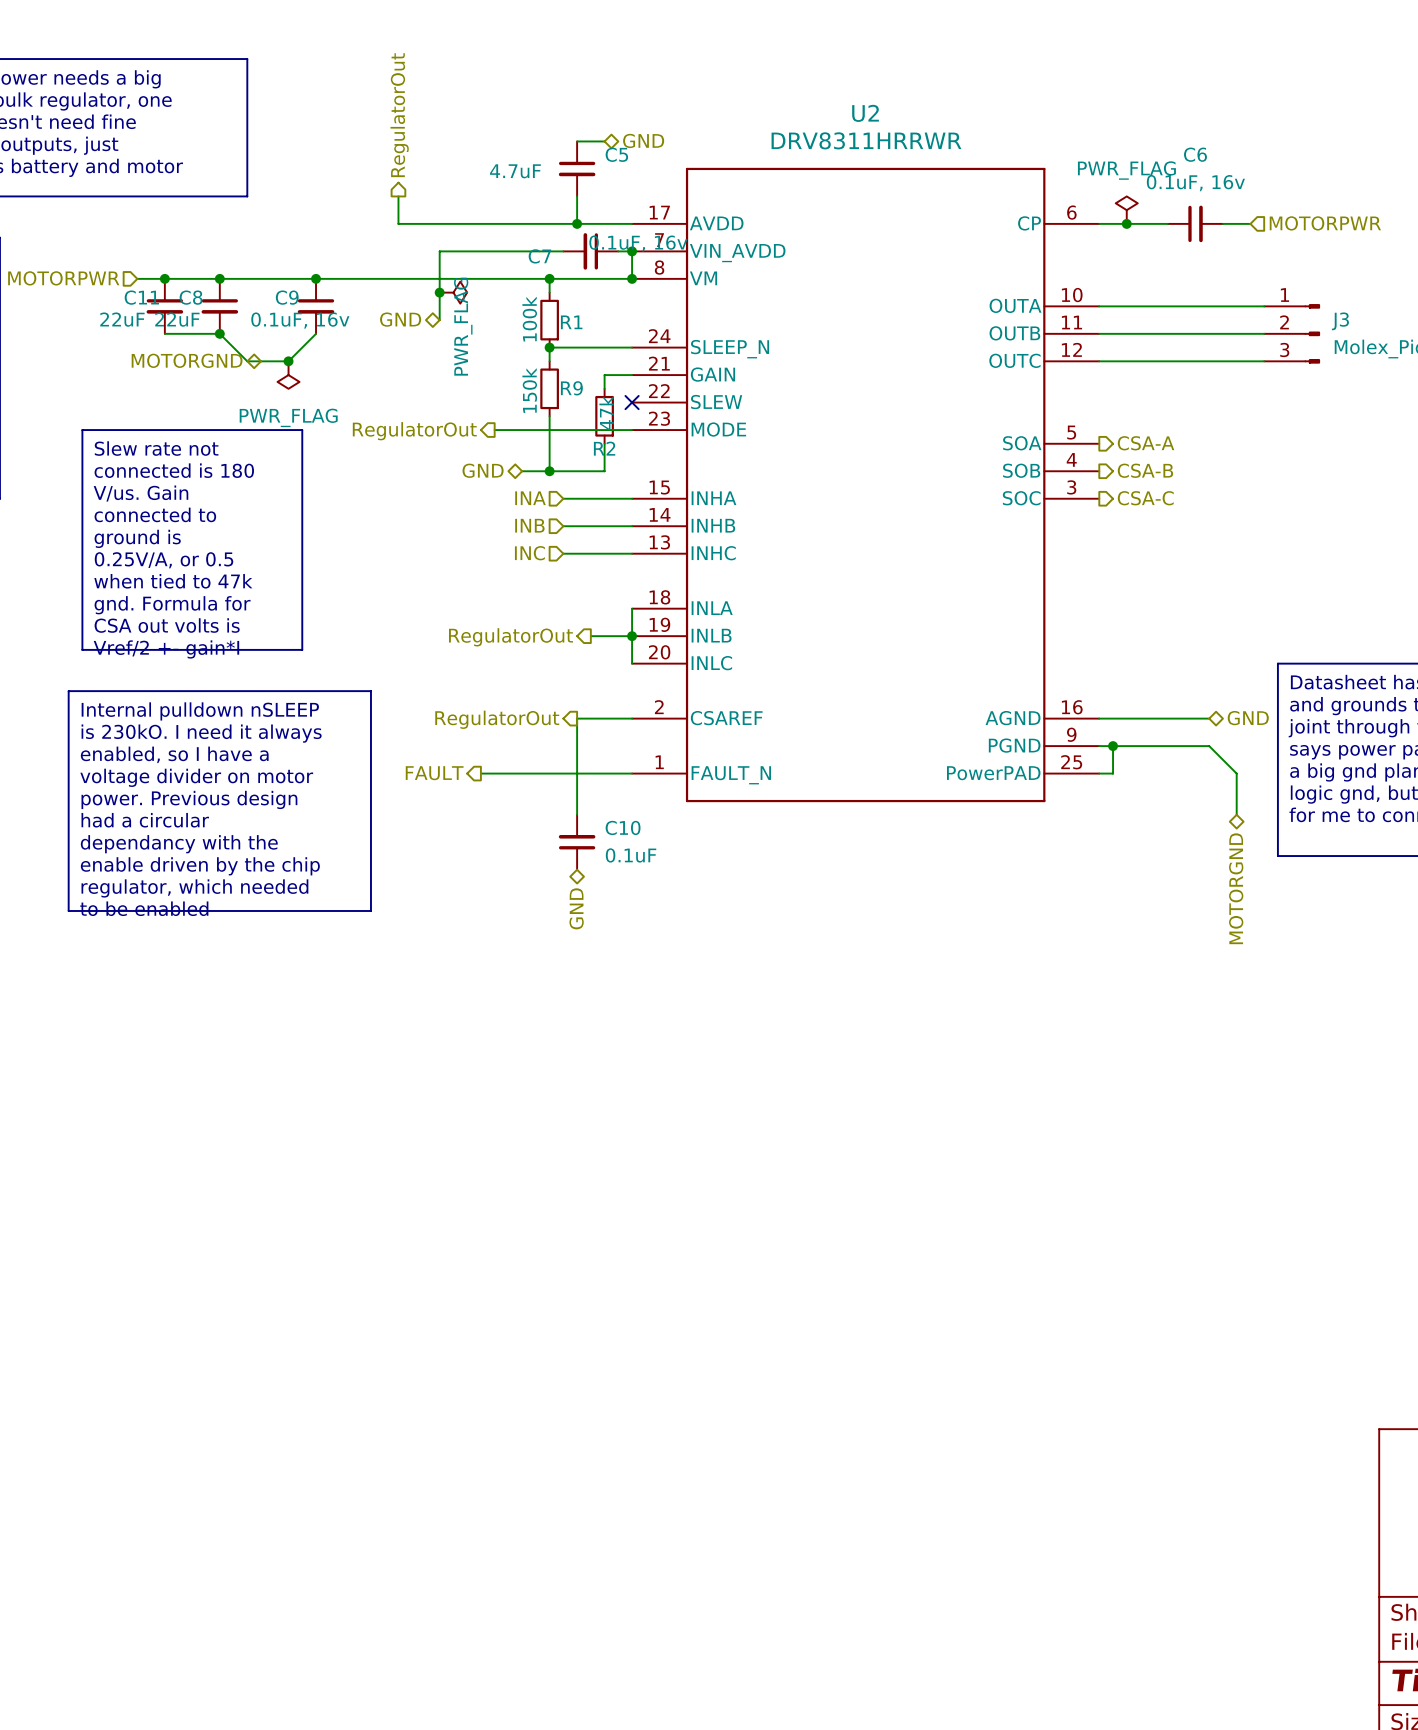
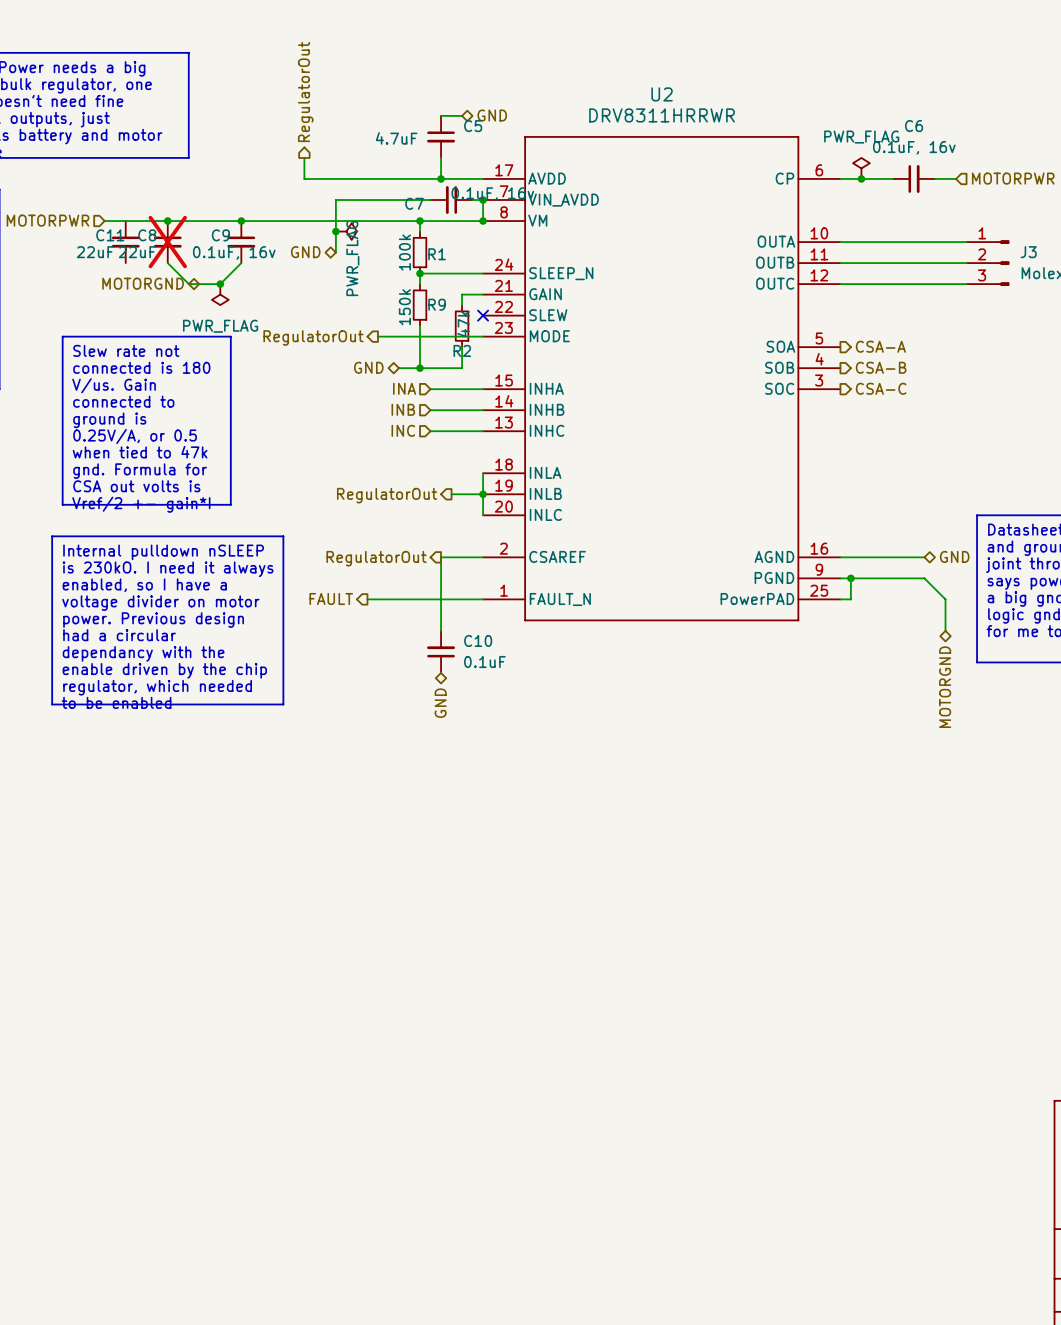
junction: (164, 278) -> none
C8 do-not-place cross: none -> (167, 242)
wire: (164, 333) (219, 333) -> none
junction: (219, 333) -> none

